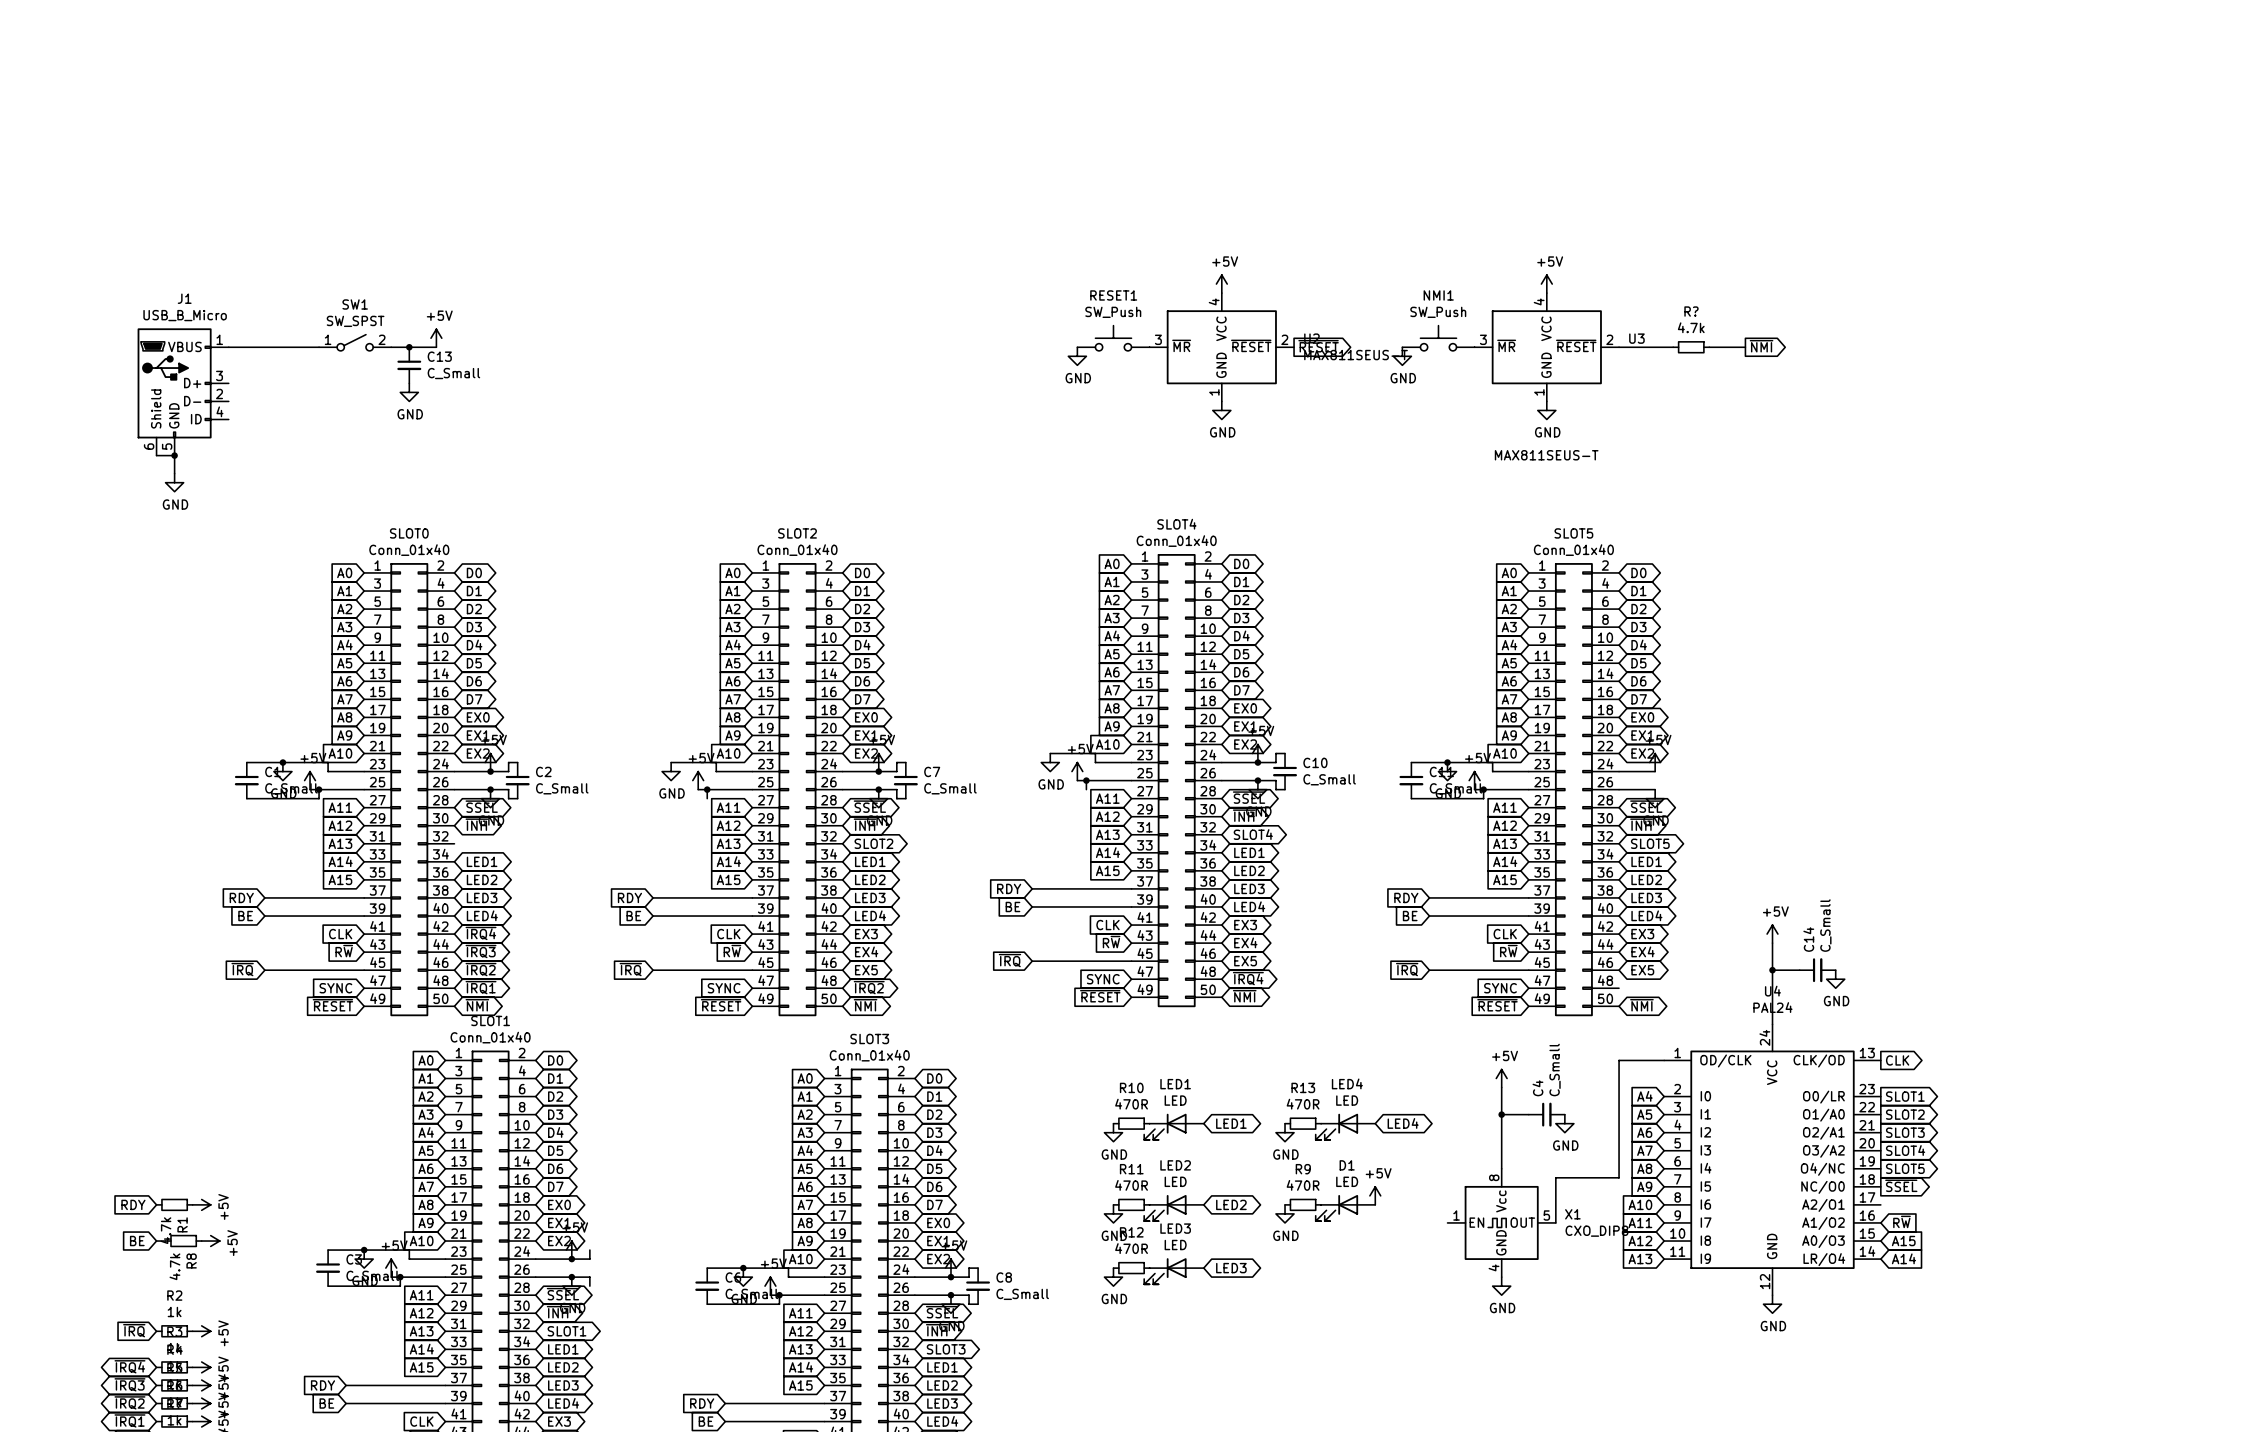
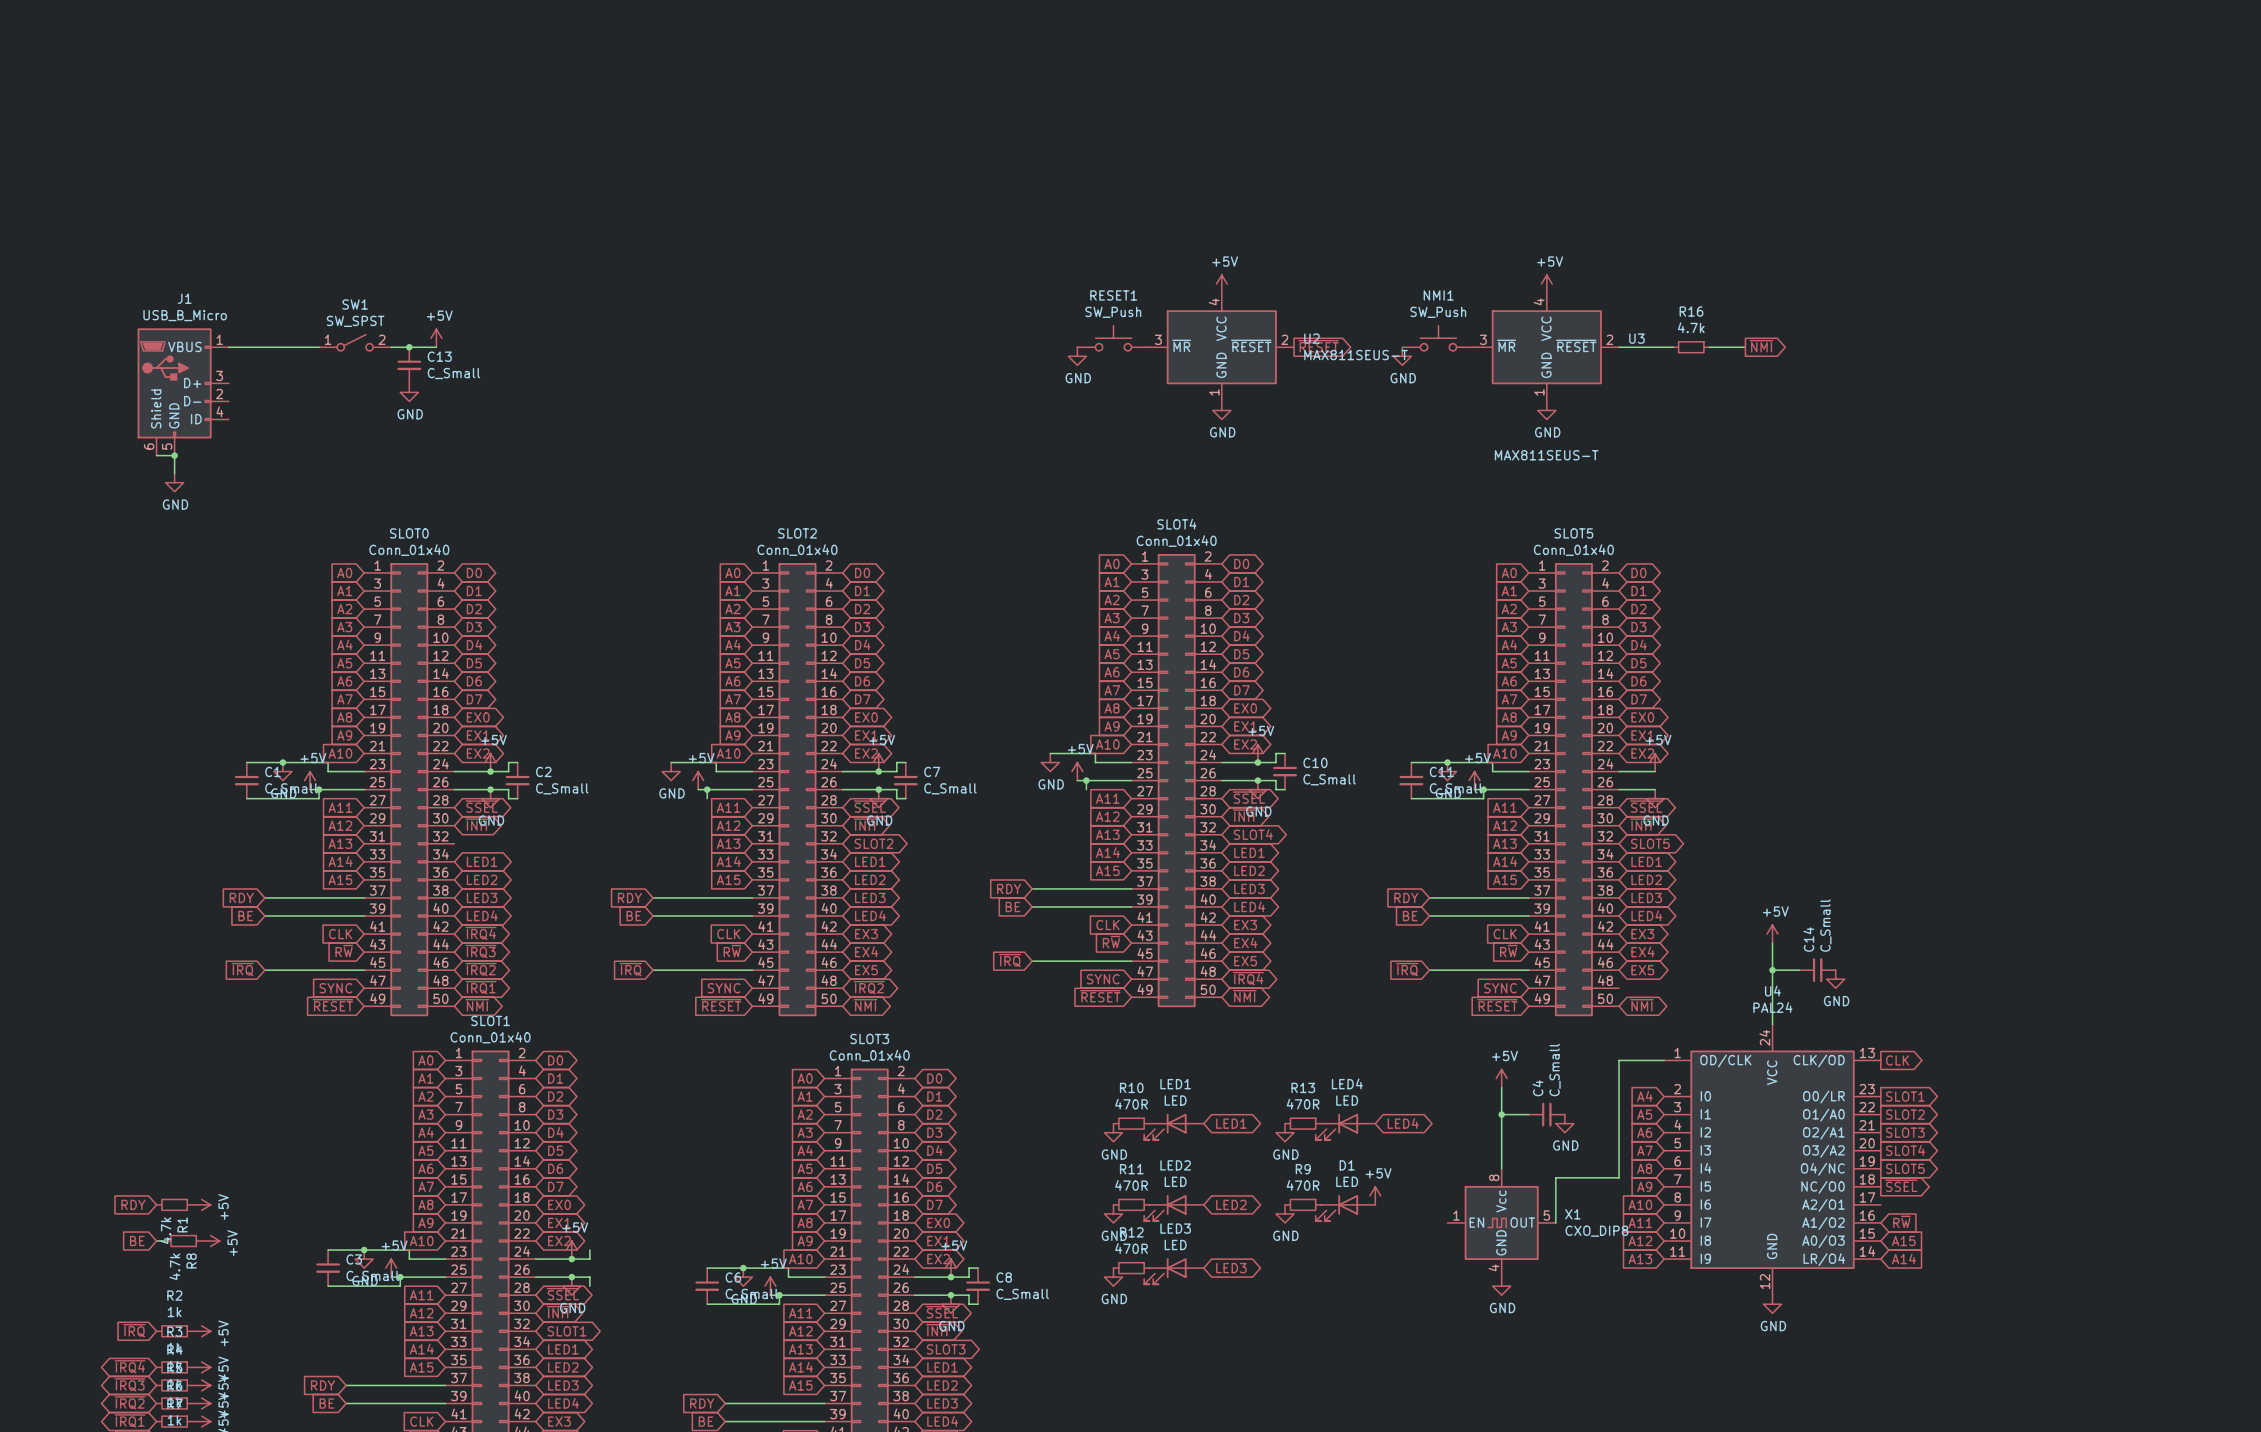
R? name: R? (1691, 311) -> R16 (1691, 311)

